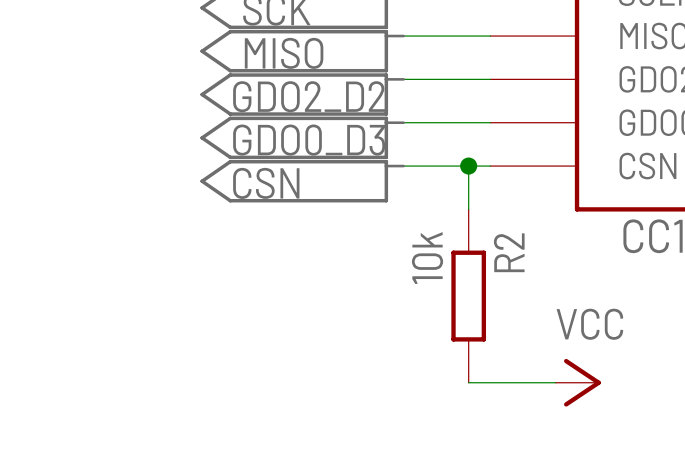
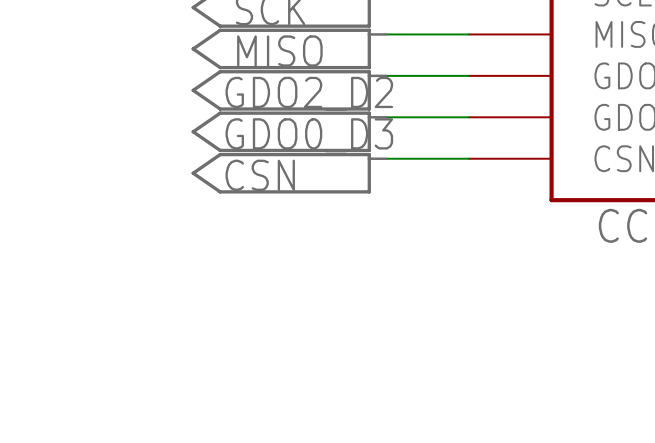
wire: (468, 166) (468, 209) -> none
junction: (468, 166) -> none
R2: 10k (468, 296) -> none
wire: (468, 382) (555, 382) -> none
power symbol: VCC (578, 382) -> none

